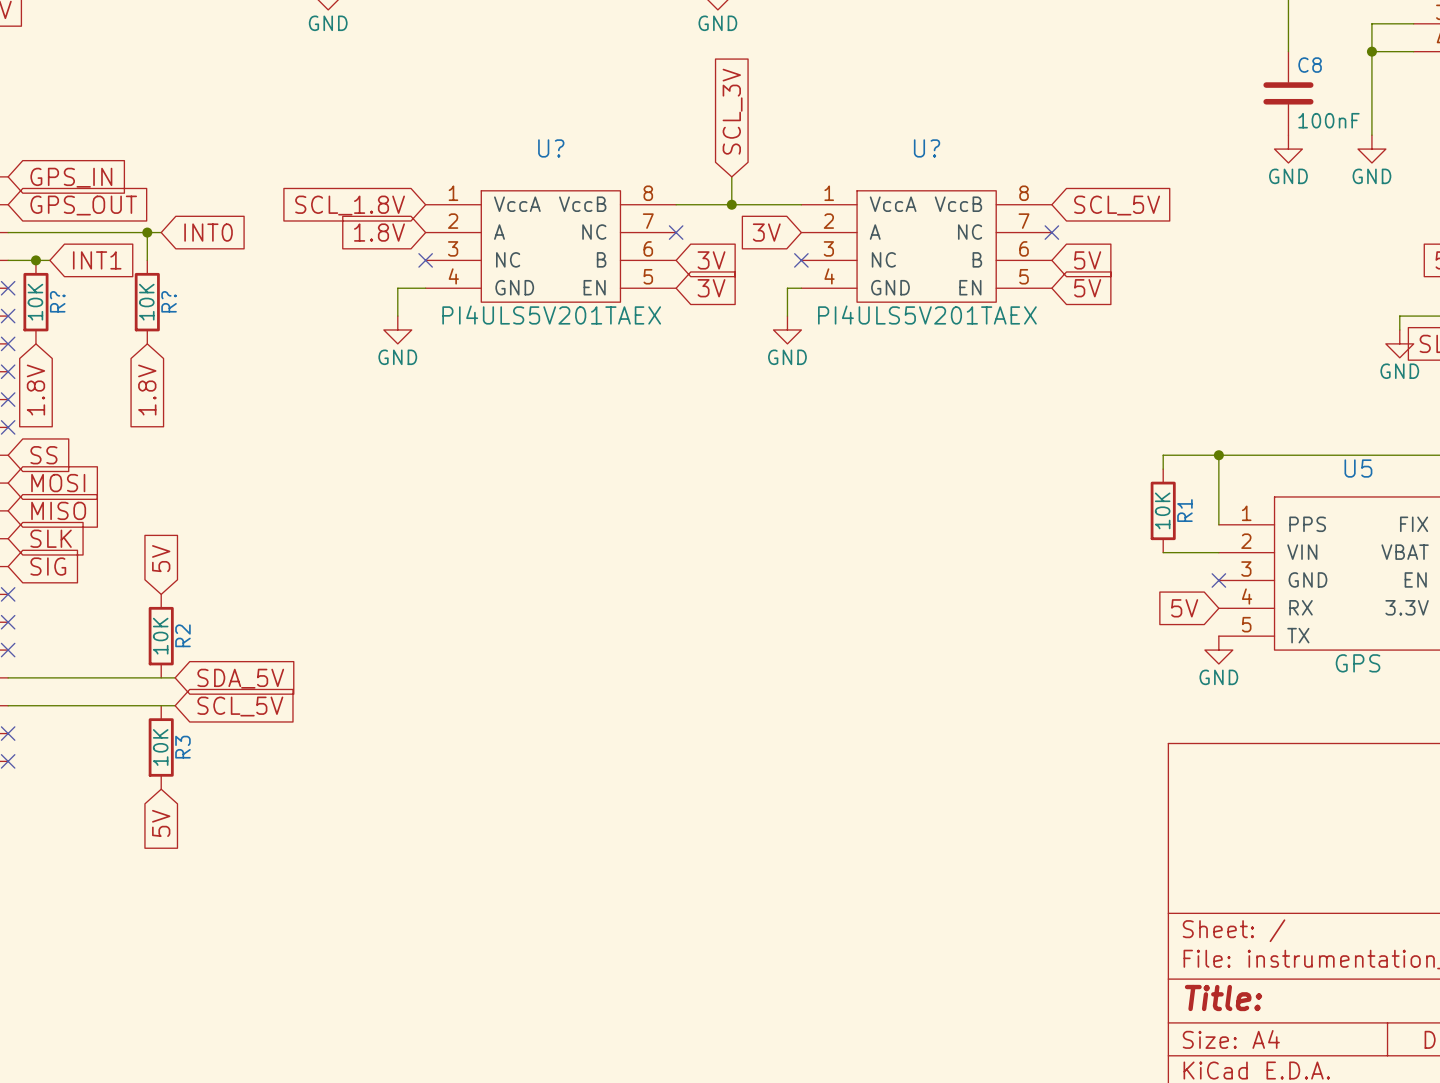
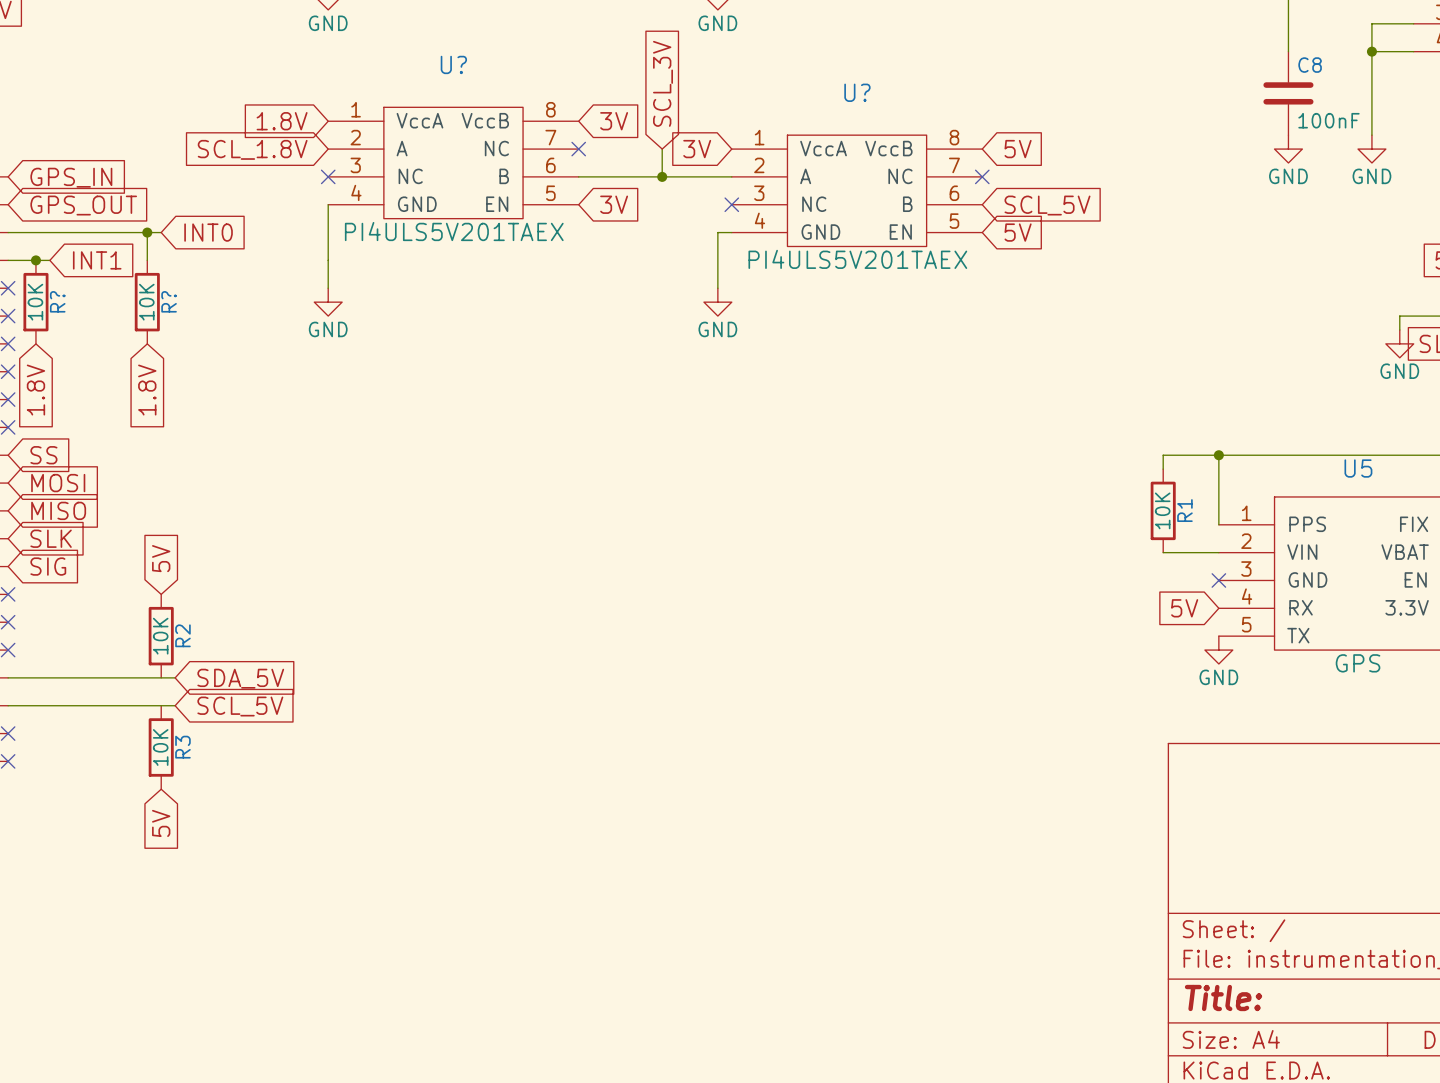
global label position: SCL_3V (732, 111) -> SCL_3V (663, 83)
global label: none -> 3V (614, 121)
no-connect mark: none -> (578, 149)
wire: none -> (662, 149) (662, 176)
global label: none -> 3V (697, 149)
global label: none -> 5V (1018, 149)
U?: none -> PI4ULS5V201TAEX (453, 162)
no-connect mark: none -> (328, 176)
junction: none -> (662, 176)
wire: (731, 176) (731, 204) -> (731, 176) (578, 176)
no-connect mark: none -> (982, 176)
wire: none -> (328, 204) (328, 288)
global label: none -> 3V (614, 204)
wire: (676, 204) (801, 204) -> none
junction: (731, 204) -> none
no-connect mark: none -> (731, 204)
global label position: SCL_1.8V (350, 205) -> SCL_1.8V (252, 149)
global label position: SCL_5V (1117, 205) -> SCL_5V (1047, 205)
global label position: 1.8V (379, 232) -> 1.8V (282, 121)
no-connect mark: (676, 232) -> none
wire: none -> (731, 232) (717, 232) (717, 288)
global label: 3V (766, 232) -> none
no-connect mark: (1051, 232) -> none
U?: PI4ULS5V201TAEX (550, 246) -> none
U? position: (926, 246) -> (857, 190)
no-connect mark: (425, 260) -> none
global label: 3V (711, 260) -> none
no-connect mark: (801, 260) -> none
global label position: 5V (1087, 260) -> 5V (1018, 232)
wire: (425, 288) (397, 288) (397, 316) -> none
global label: 3V (711, 288) -> none
wire: (801, 288) (787, 288) (787, 316) -> none
global label: 5V (1087, 288) -> none
power symbol position: GND (397, 329) -> GND (328, 302)
power symbol position: GND (787, 329) -> GND (717, 302)

